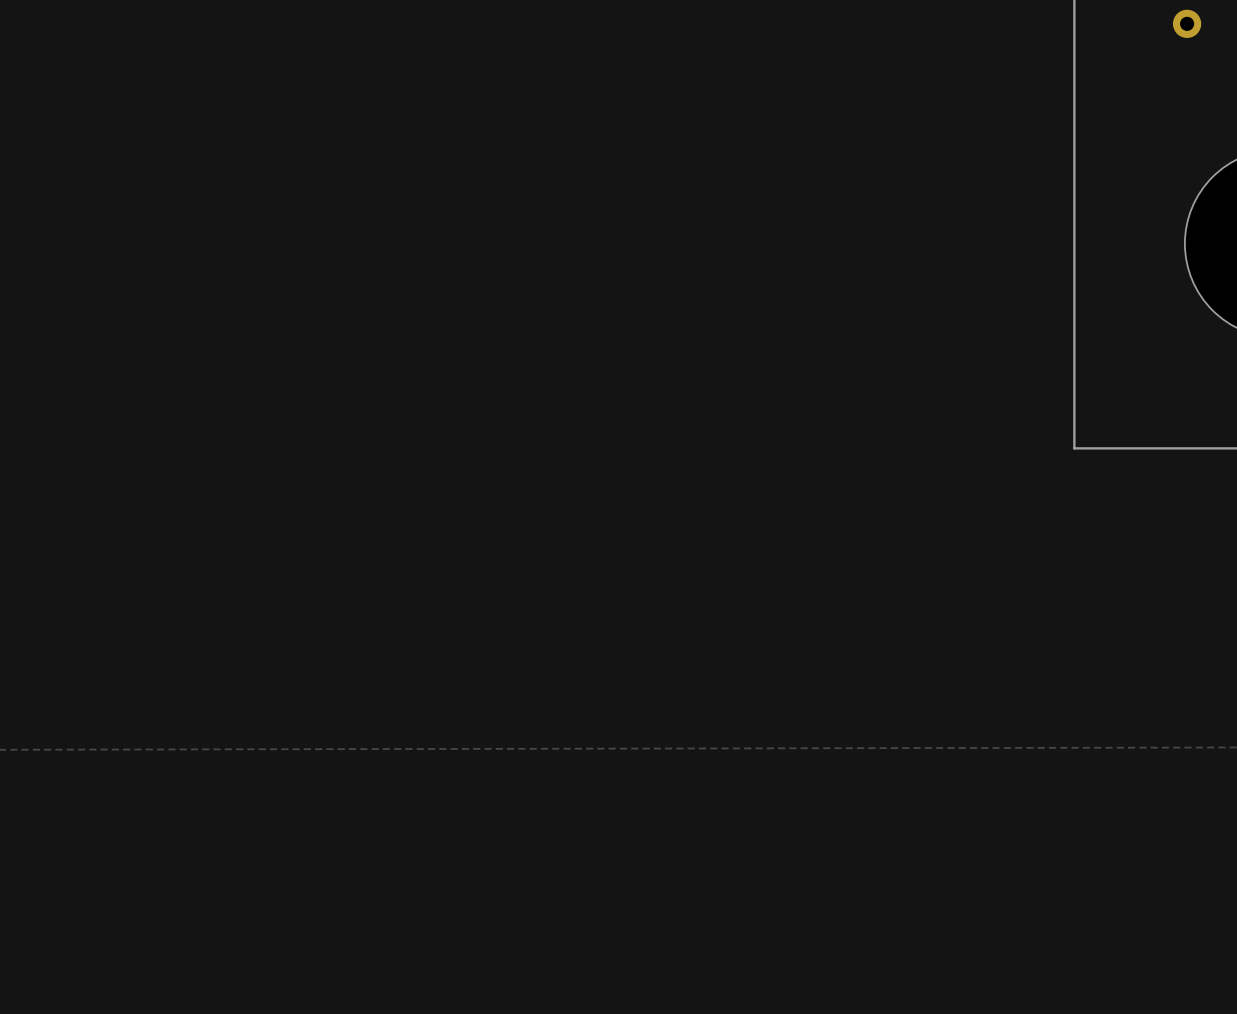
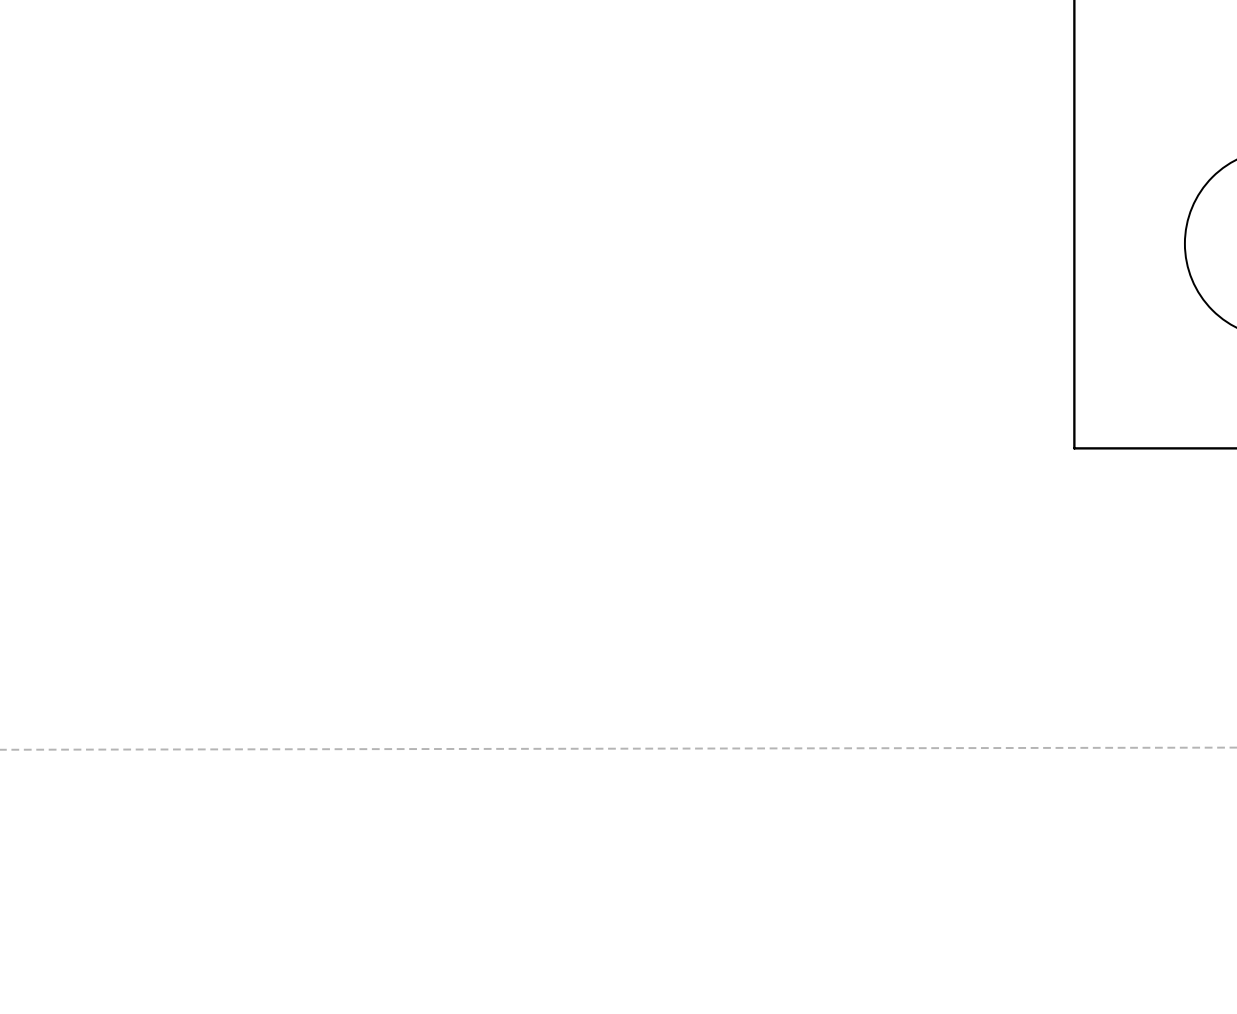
via: (1187, 23) -> none

